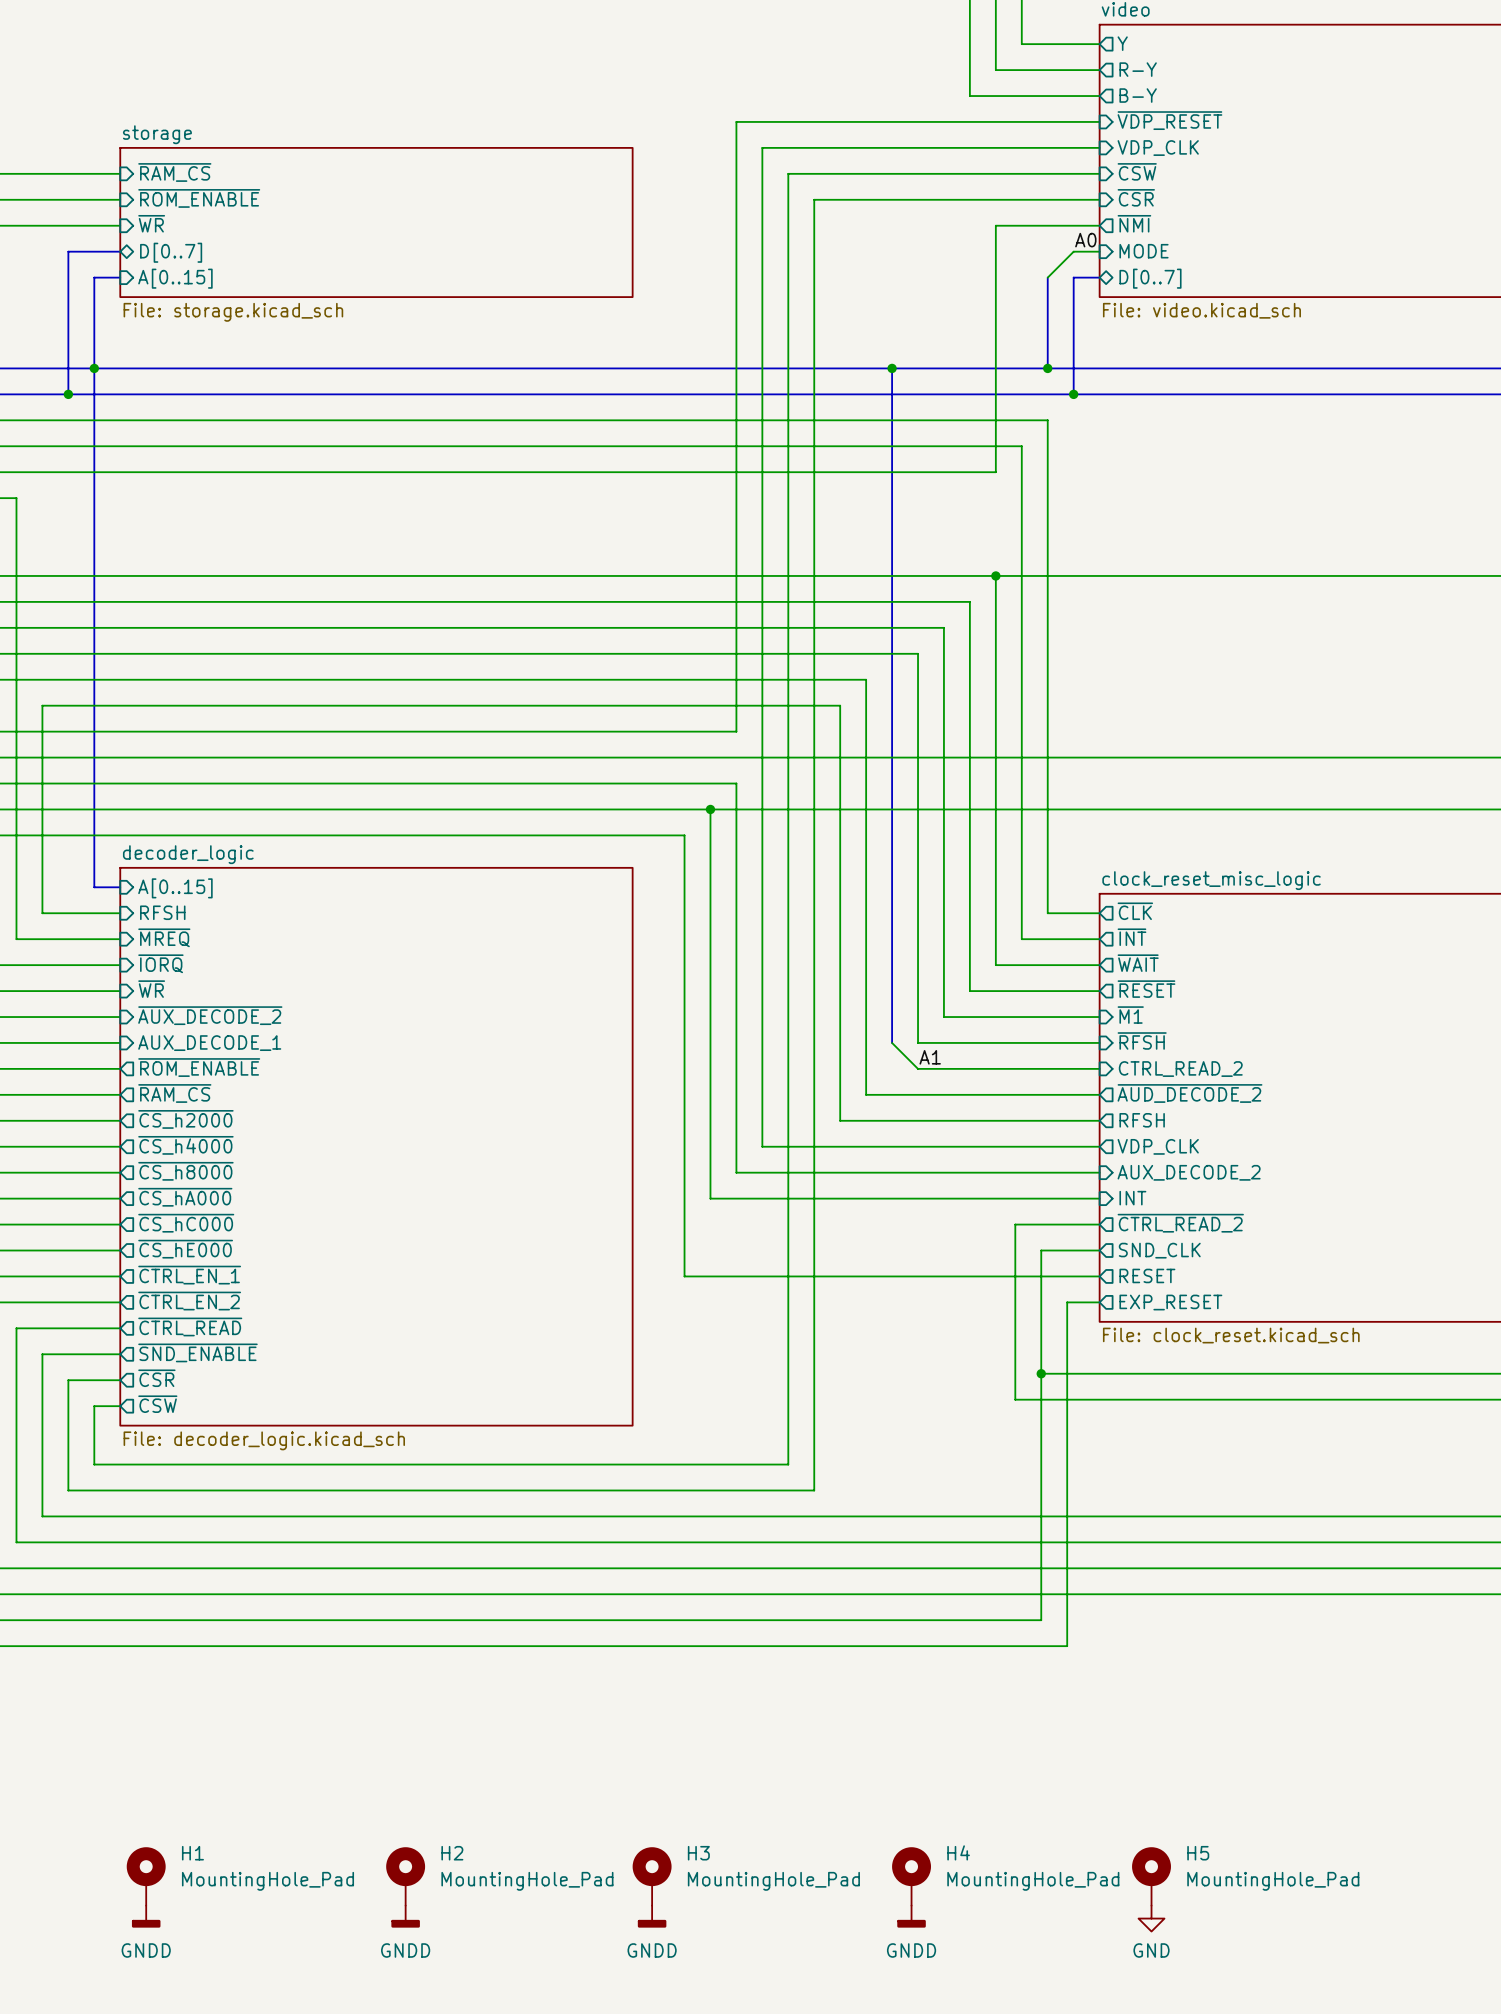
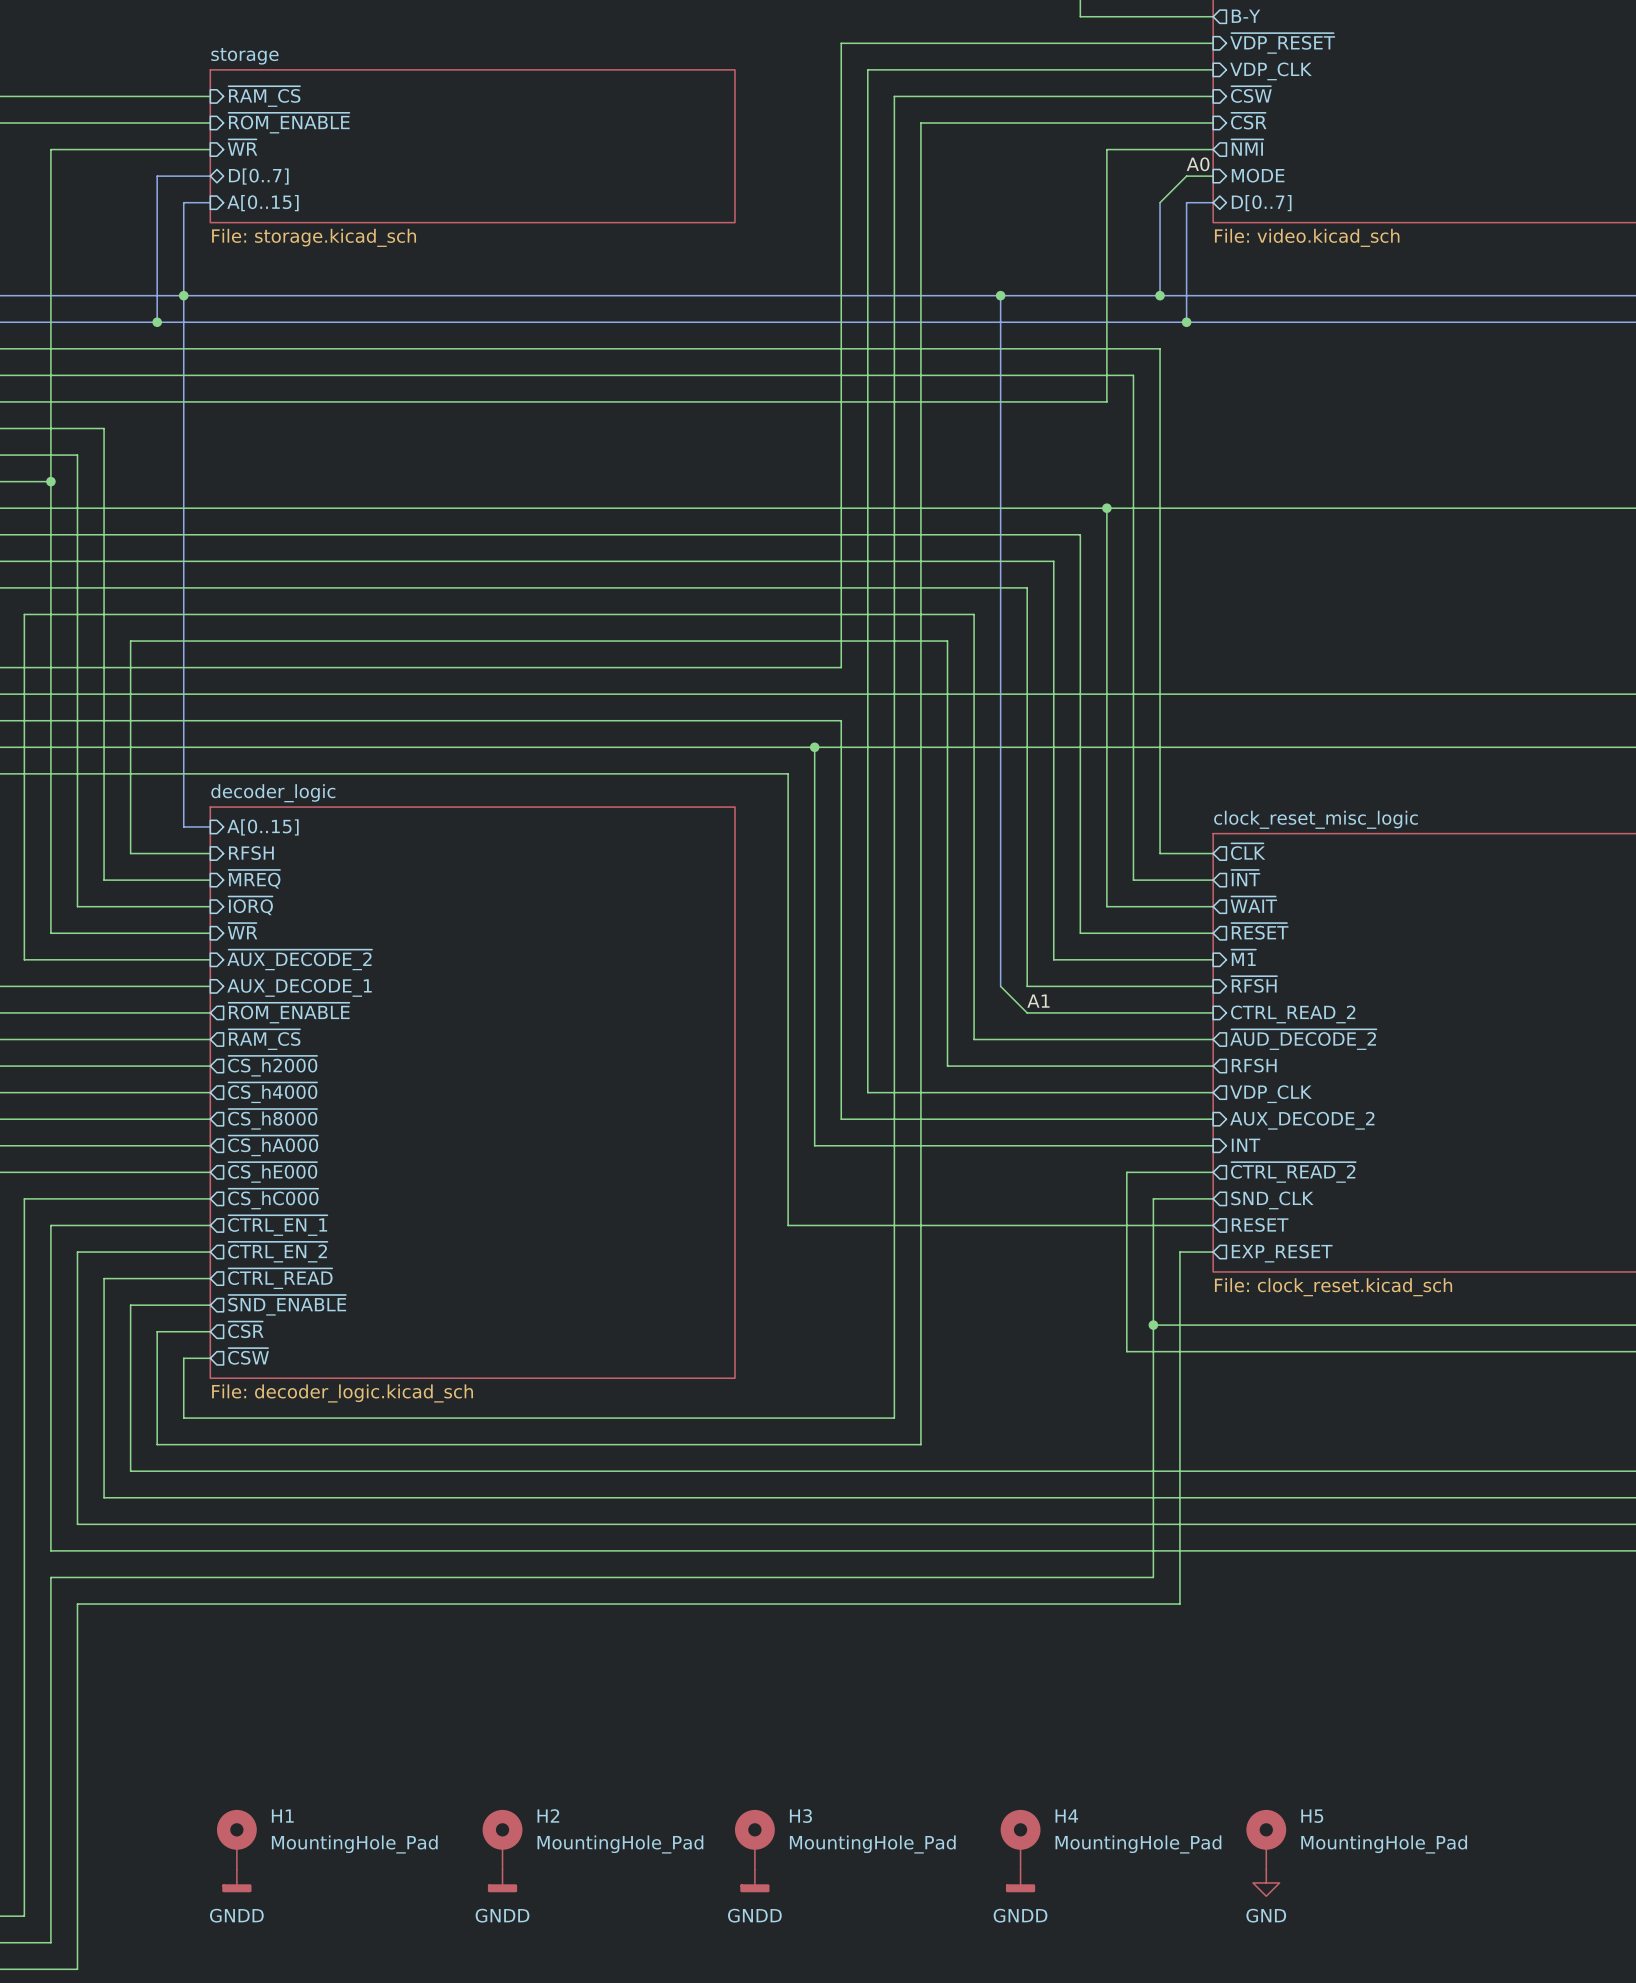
sheet pin: ~{CS_hC000} (186, 1223) -> ~{CS_hE000} (272, 1172)
sheet pin: ~{CS_hE000} (185, 1249) -> ~{CS_hC000} (273, 1199)

